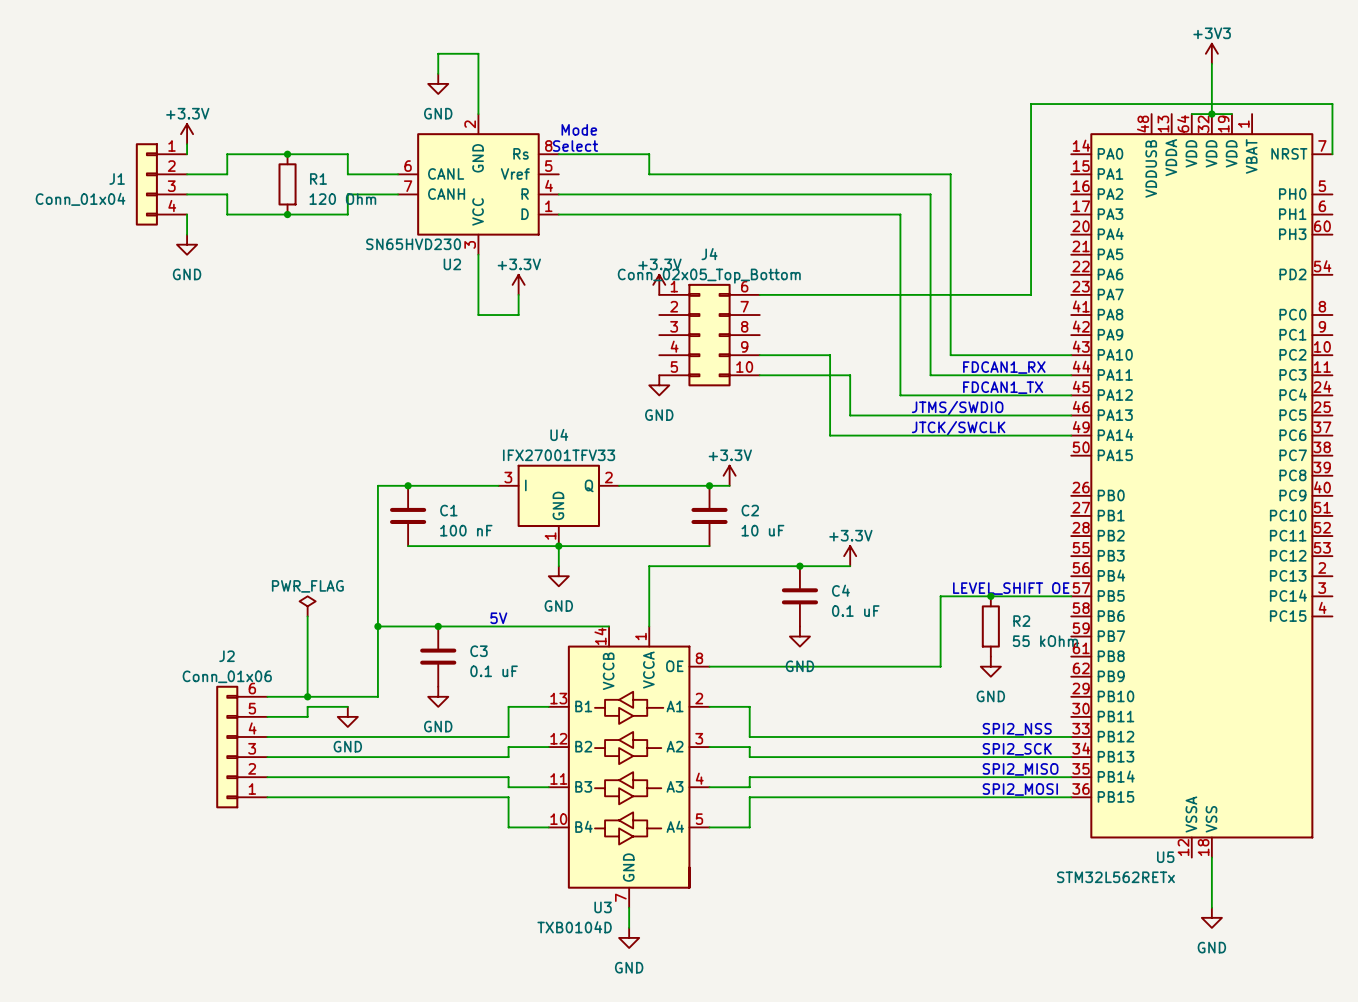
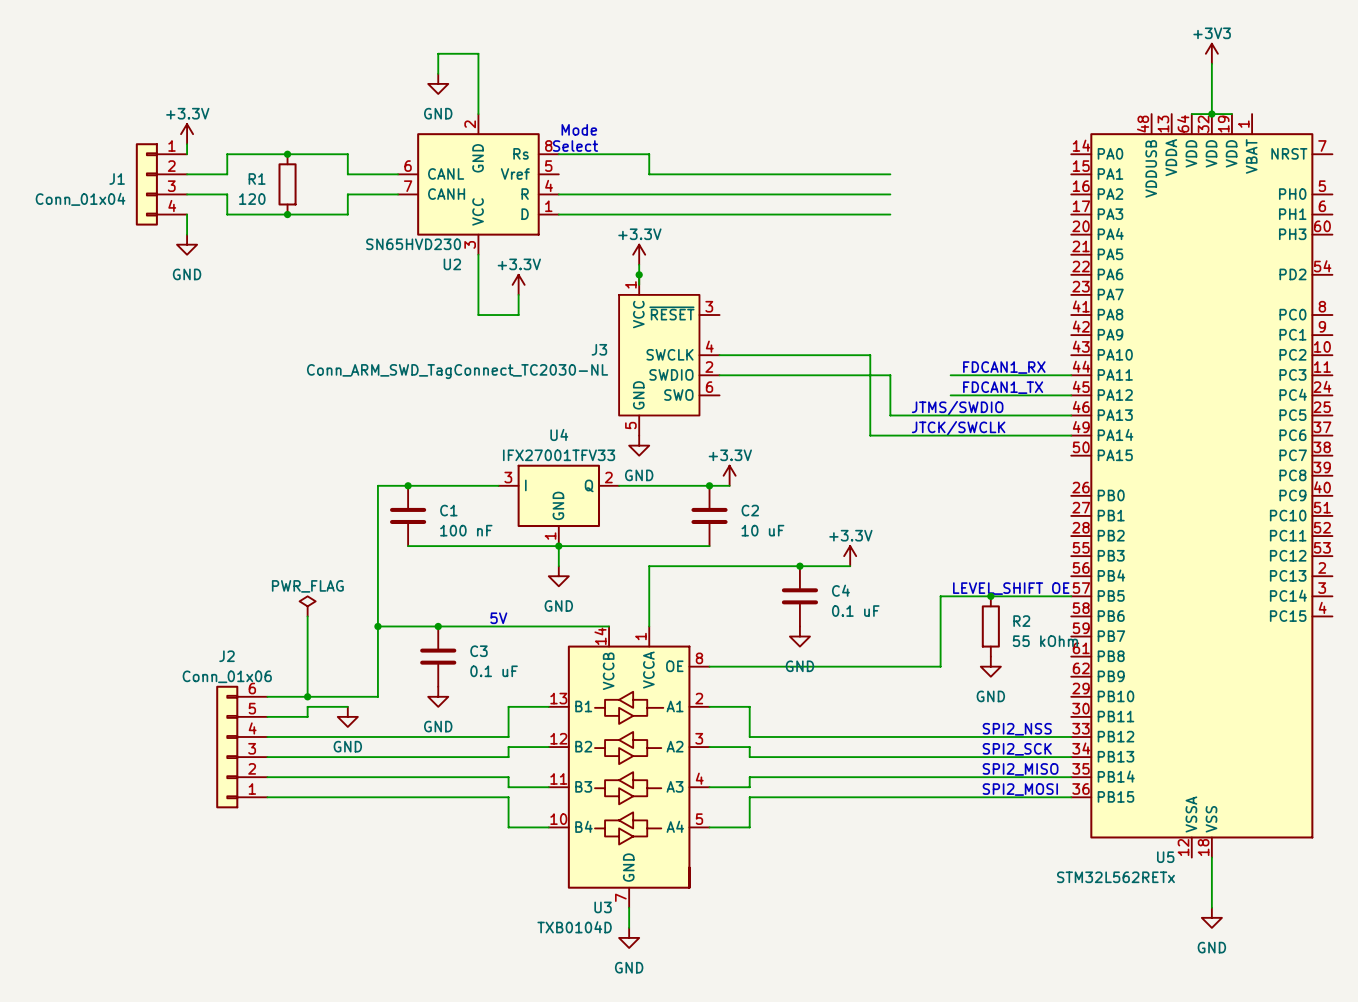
wire: (1332, 154) (1332, 104) (1031, 104) (1031, 294) (759, 294) -> none
wire: (890, 174) (950, 174) (950, 355) (1071, 355) -> none
R1 name position: R1 (318, 179) -> R1 (257, 179)
wire: (890, 194) (930, 194) (930, 375) (950, 375) -> none
R1 value: 120 Ohm (342, 199) -> 120 (252, 199)
wire: (890, 214) (900, 214) (900, 395) (950, 395) -> none
wire: none -> (639, 264) (639, 284)
junction: none -> (639, 274)
power symbol position: +3.3V (659, 284) -> +3.3V (639, 254)
J4: Conn_02x05_Top_Bottom (709, 335) -> none
J3: none -> Conn_ARM_SWD_TagConnect_TC2030-NL (669, 355)
wire: (830, 355) (830, 435) (870, 435) -> (830, 355) (870, 355) (870, 435)
wire: (850, 375) (850, 415) (890, 415) -> (850, 375) (890, 375) (890, 415)
power symbol position: GND (659, 385) -> GND (639, 445)

